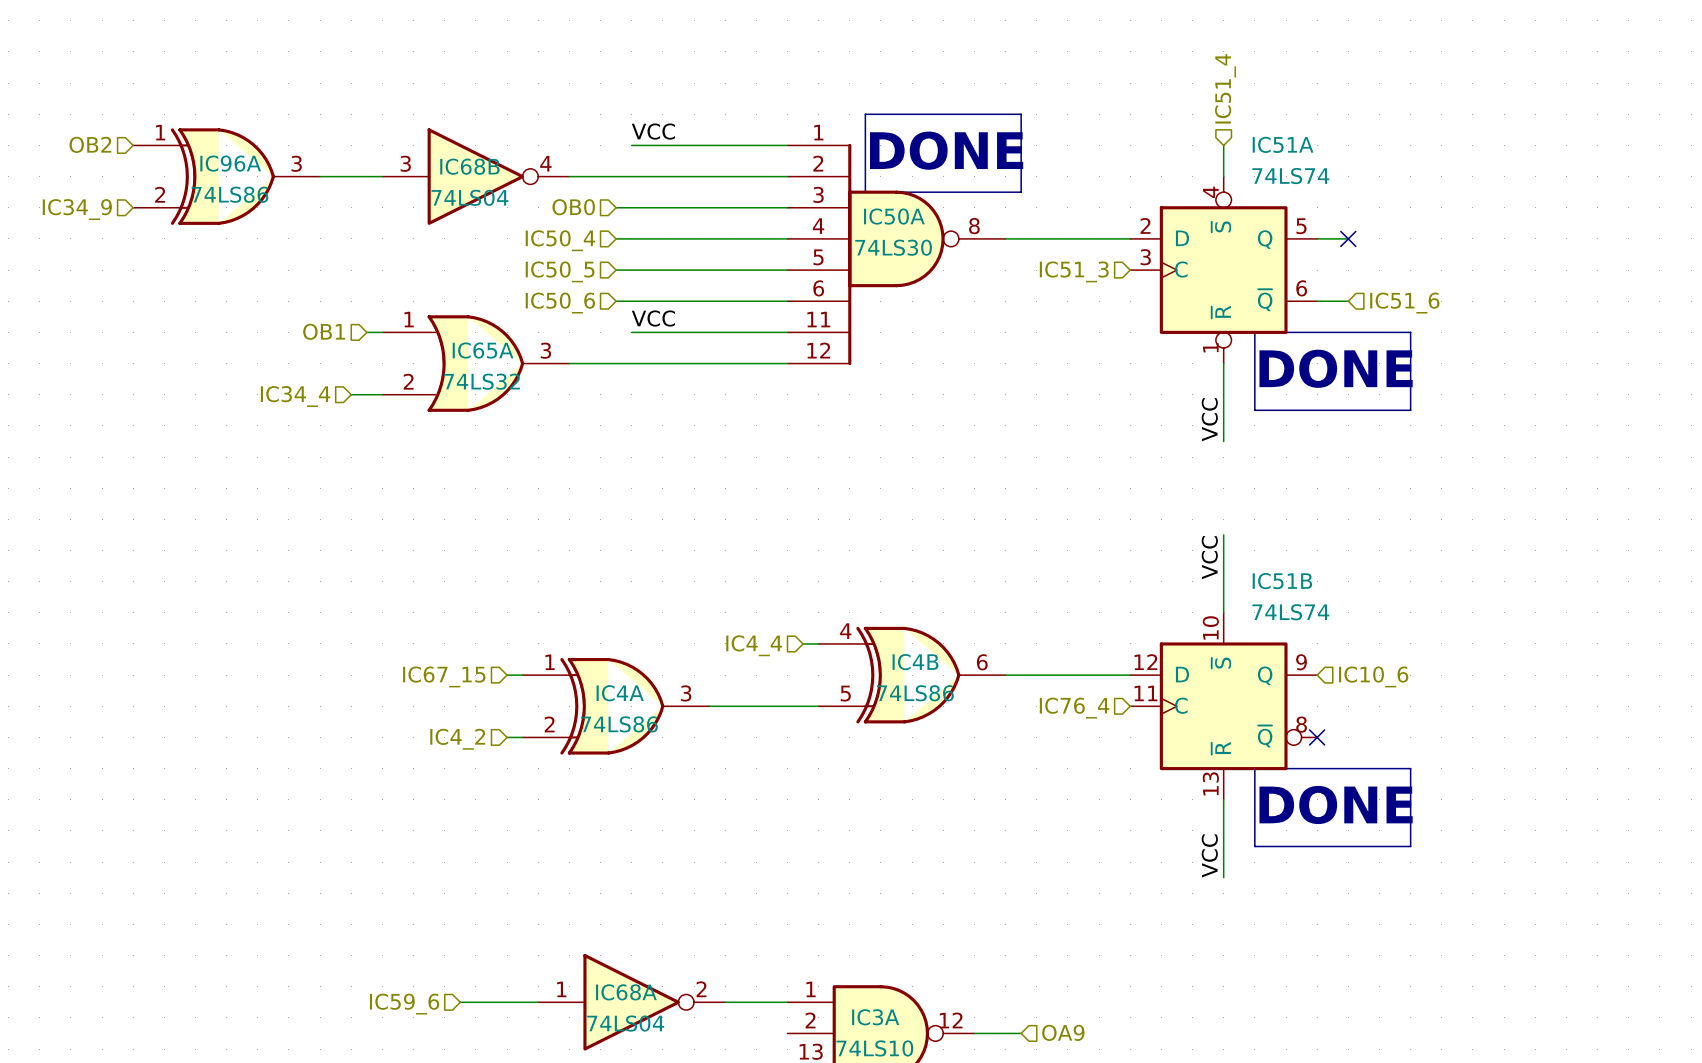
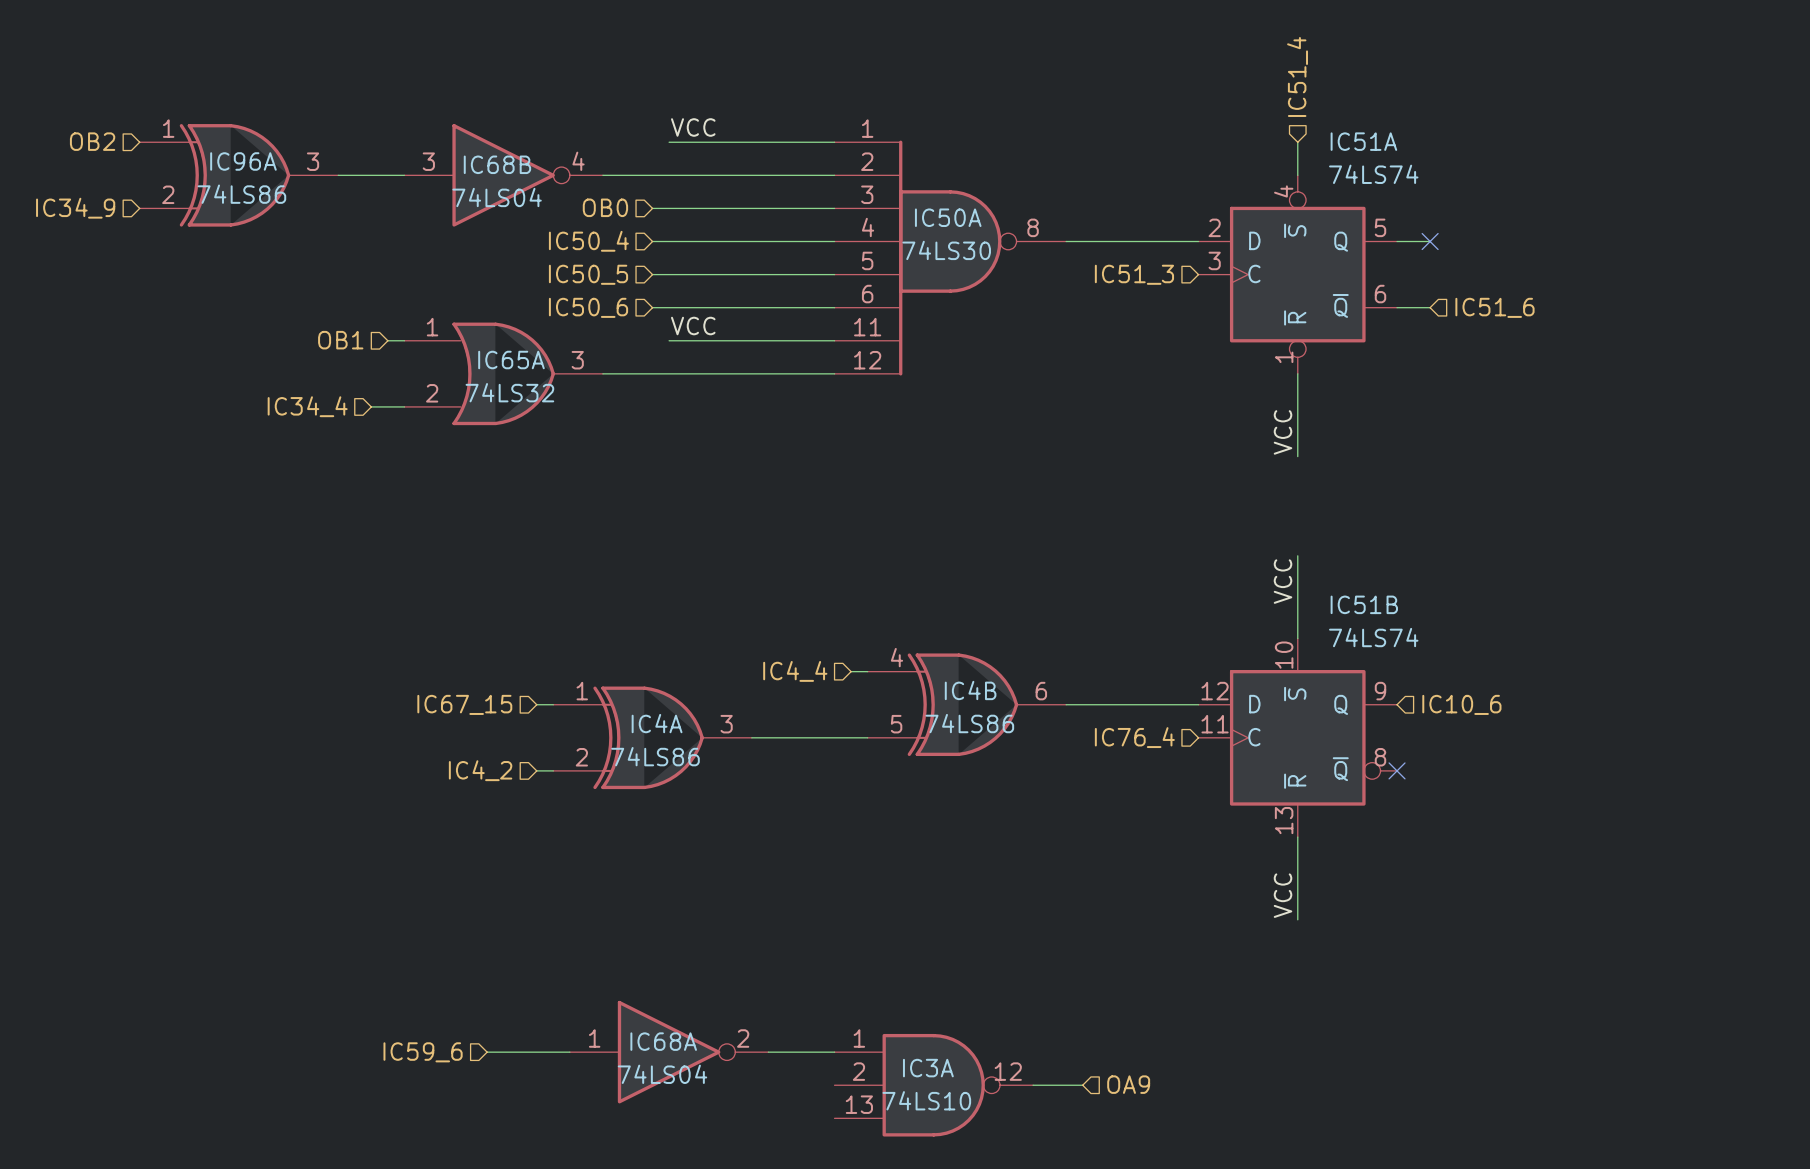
line: (865, 114) (1021, 114) (1021, 192) (865, 192) (865, 114) -> none
text: DONE (946, 150) -> none
line: (1254, 332) (1410, 332) (1410, 410) (1254, 410) (1254, 332) -> none
text: DONE (1336, 368) -> none
line: (1254, 768) (1254, 846) (1410, 846) (1410, 768) (1254, 768) -> none
text: DONE (1336, 804) -> none

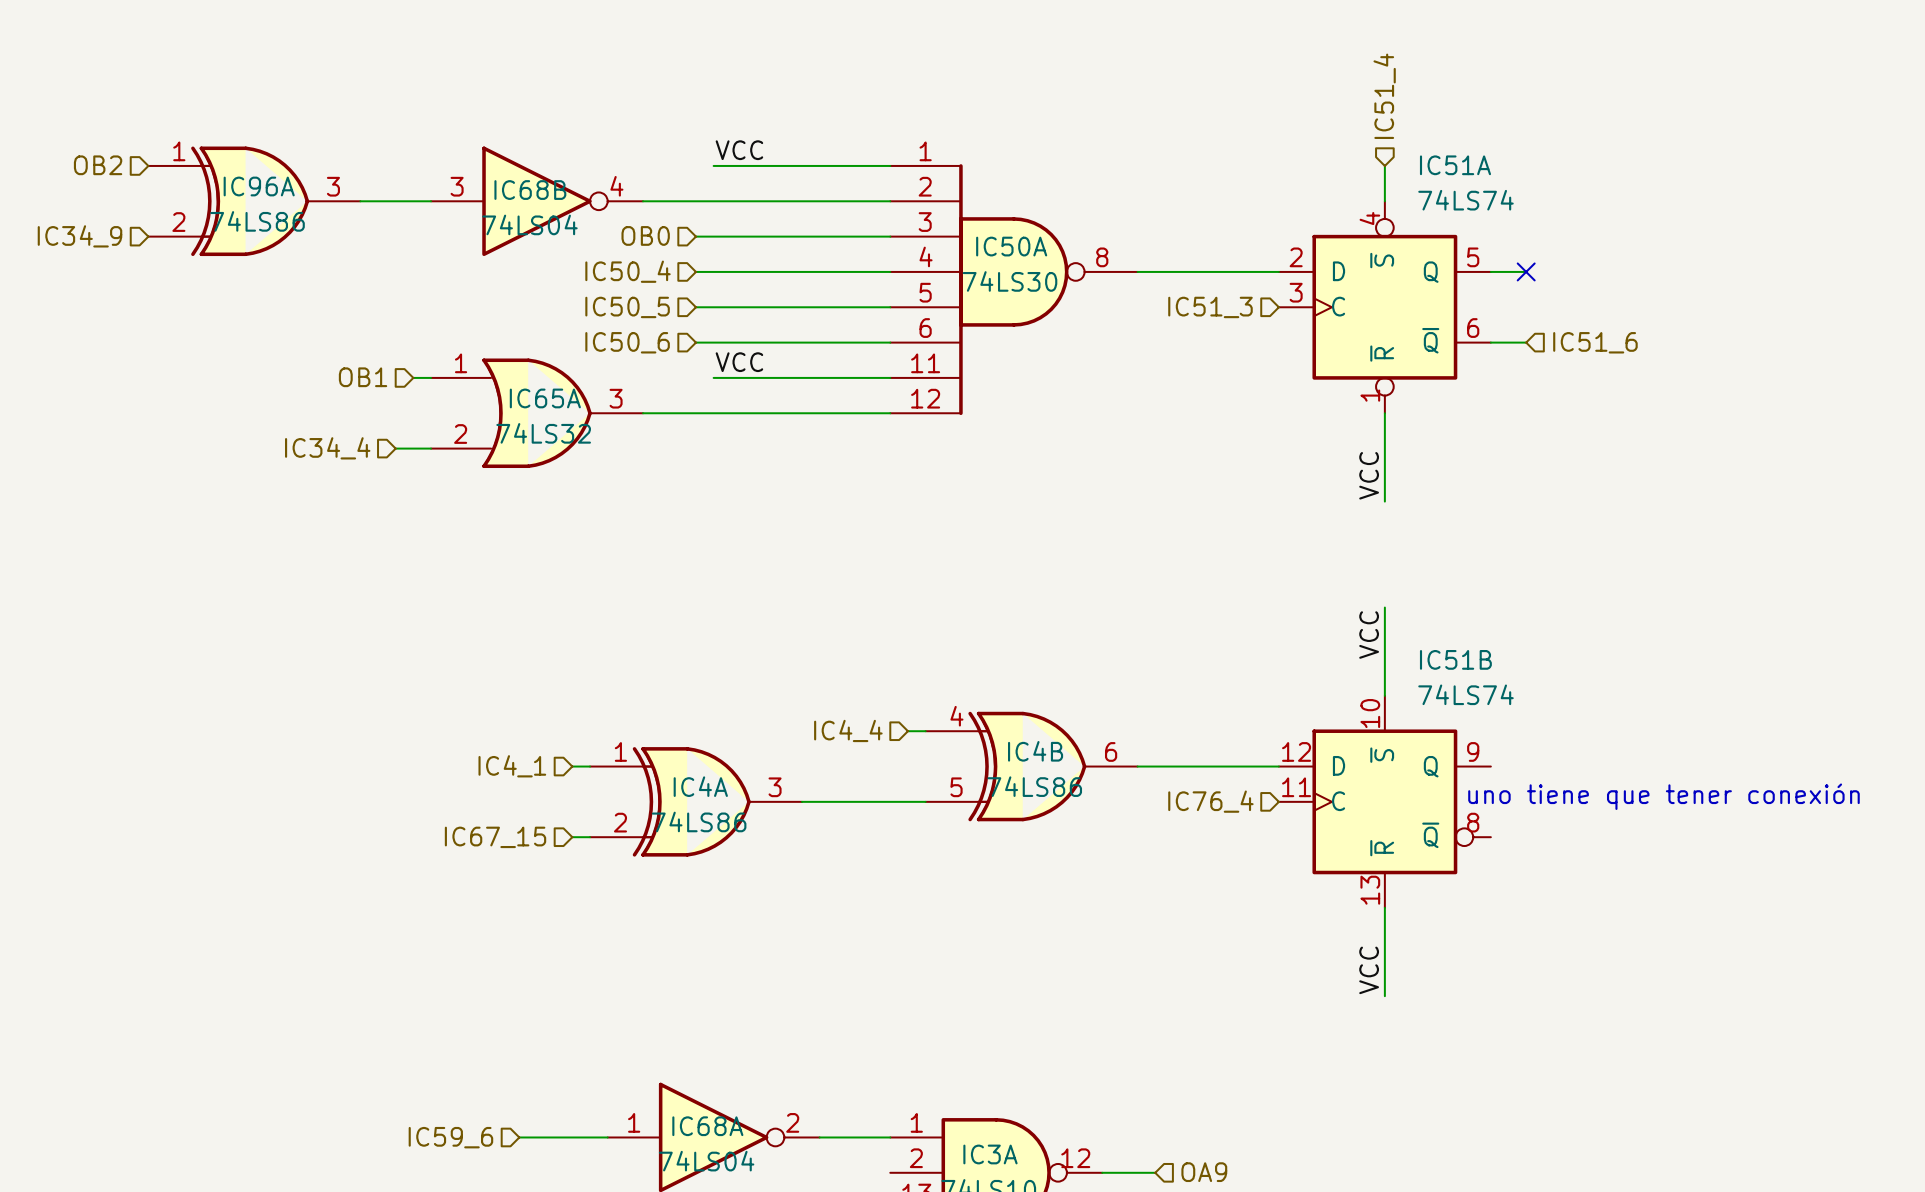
hierarchical label: IC67_15 (464, 704) -> IC4_1 (512, 766)
hierarchical label: IC10_6 (1461, 704) -> none
text: none -> uno tiene que tener conexión (1663, 796)
hierarchical label: IC4_2 (480, 770) -> IC67_15 (495, 837)
no-connect mark: (1397, 770) -> none

